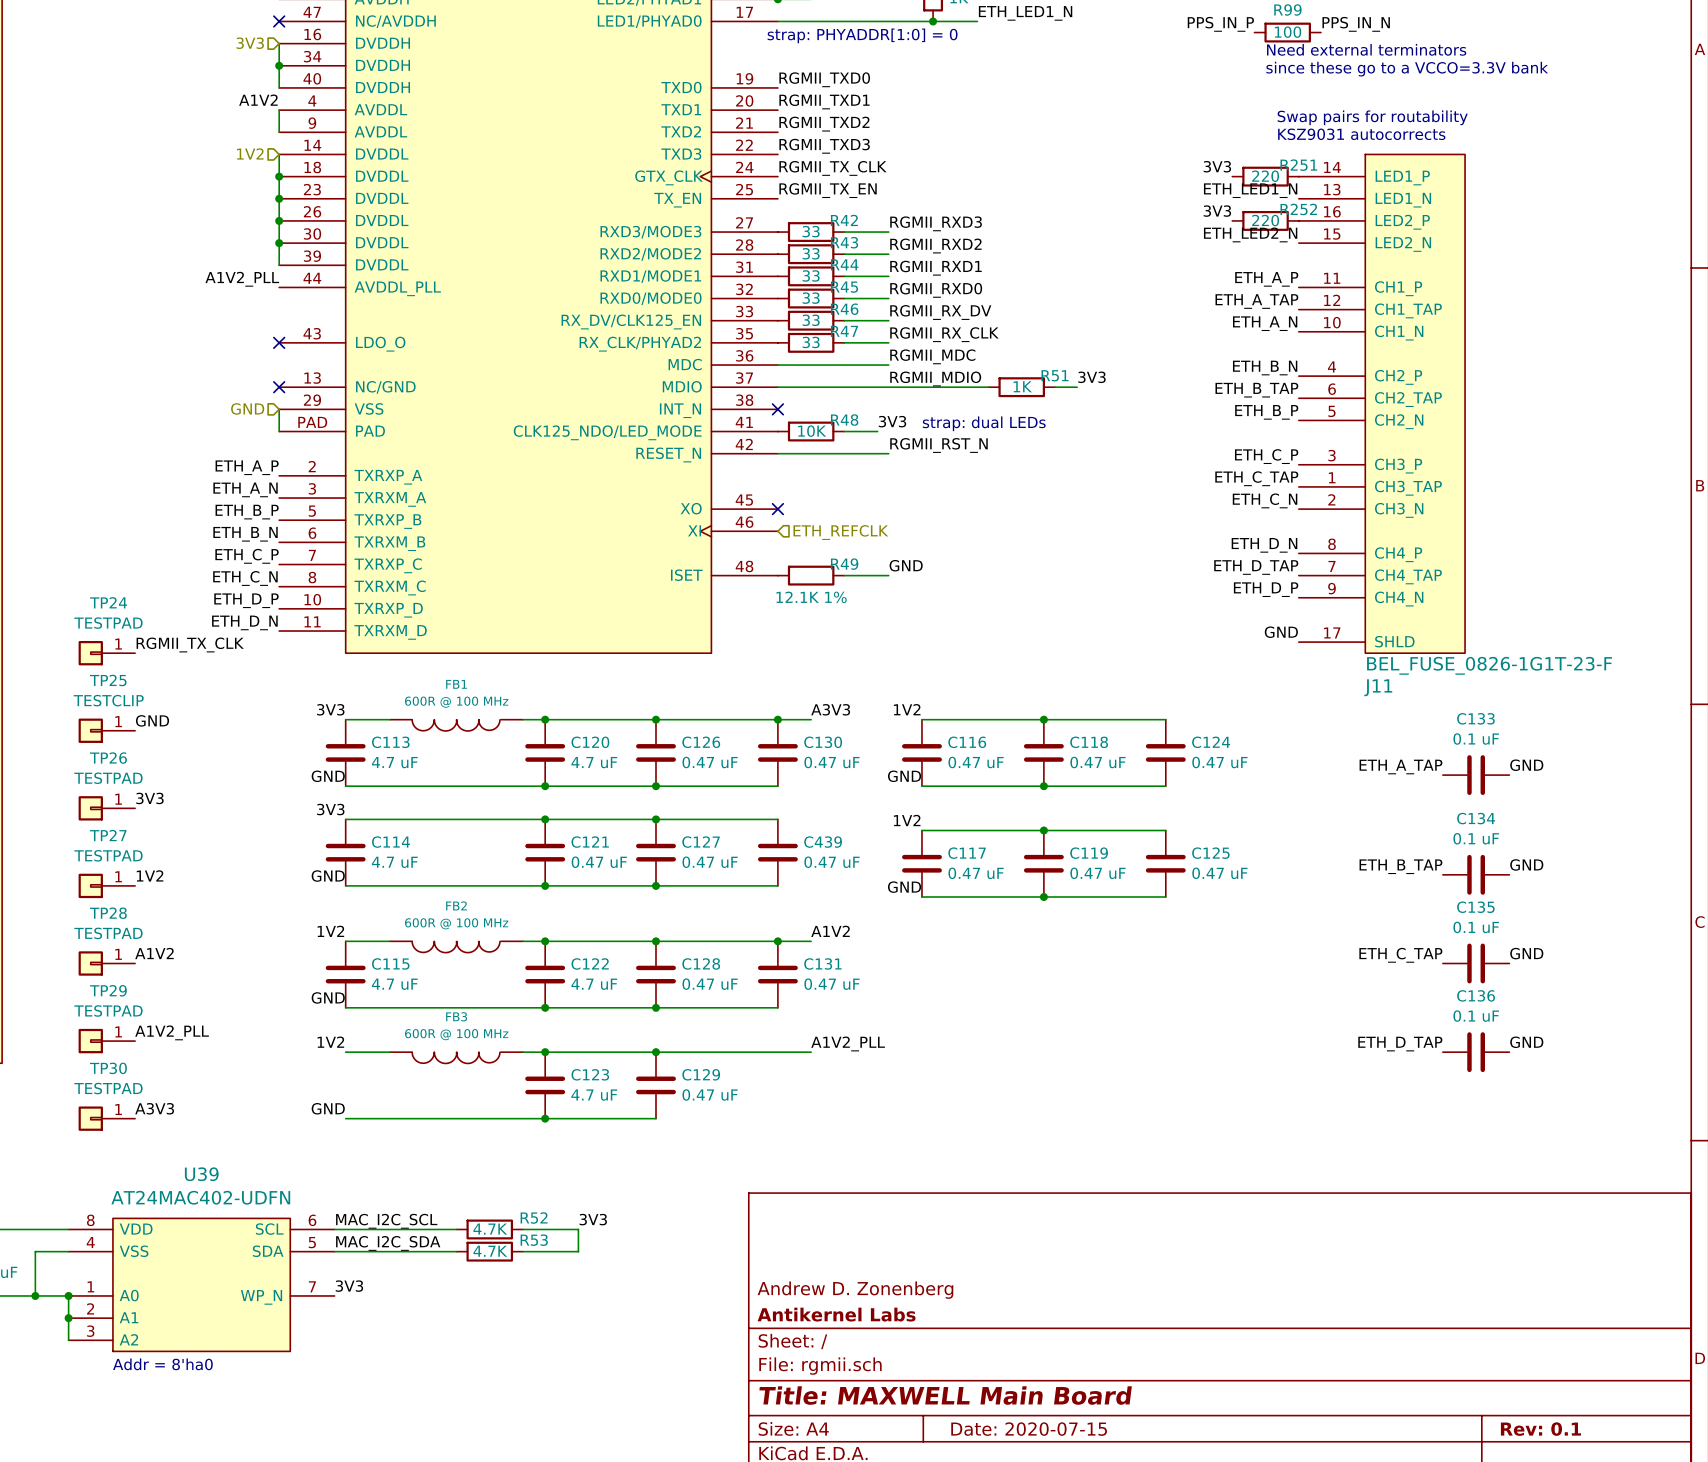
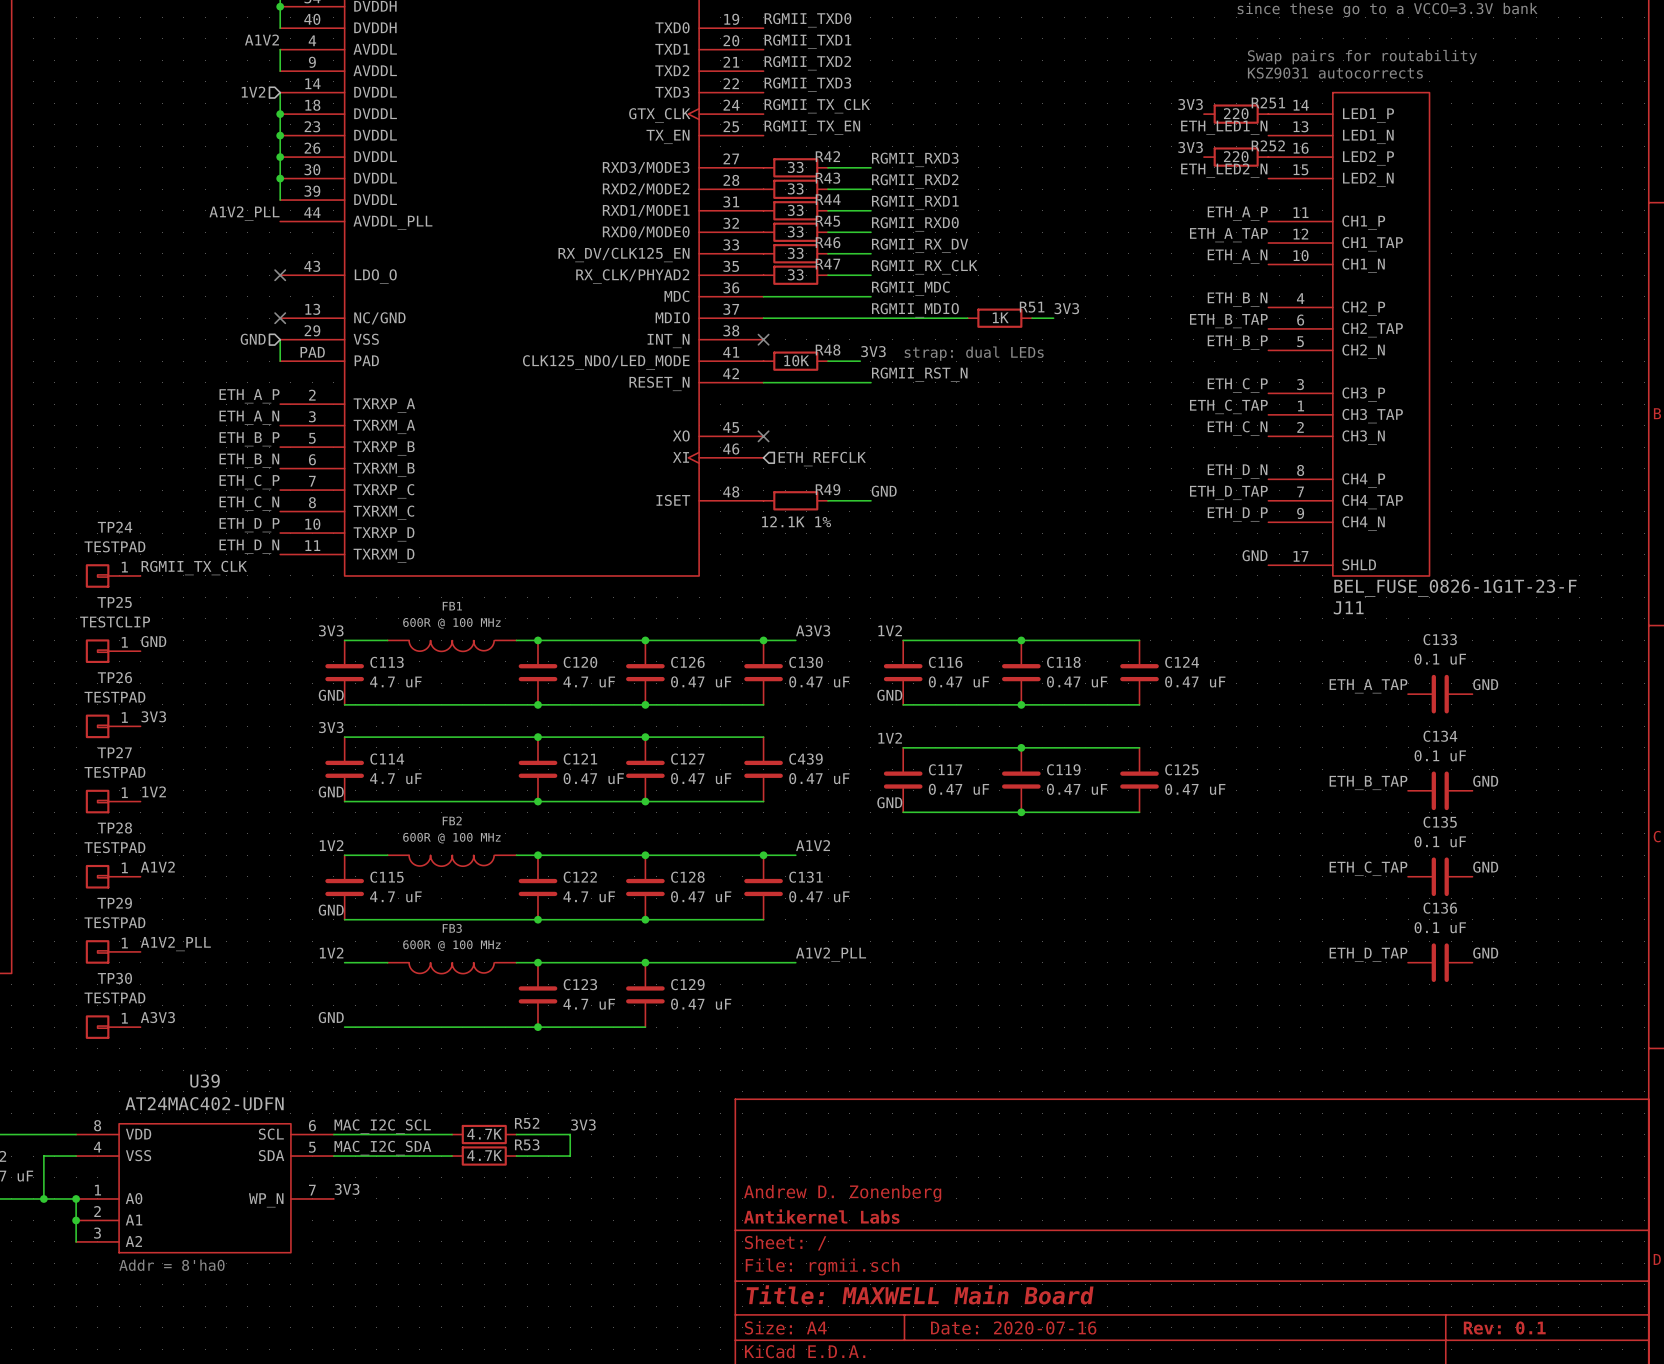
title block: Date: 2020-07-15 (1029, 1429) -> Date: 2020-07-16 (1013, 1327)

